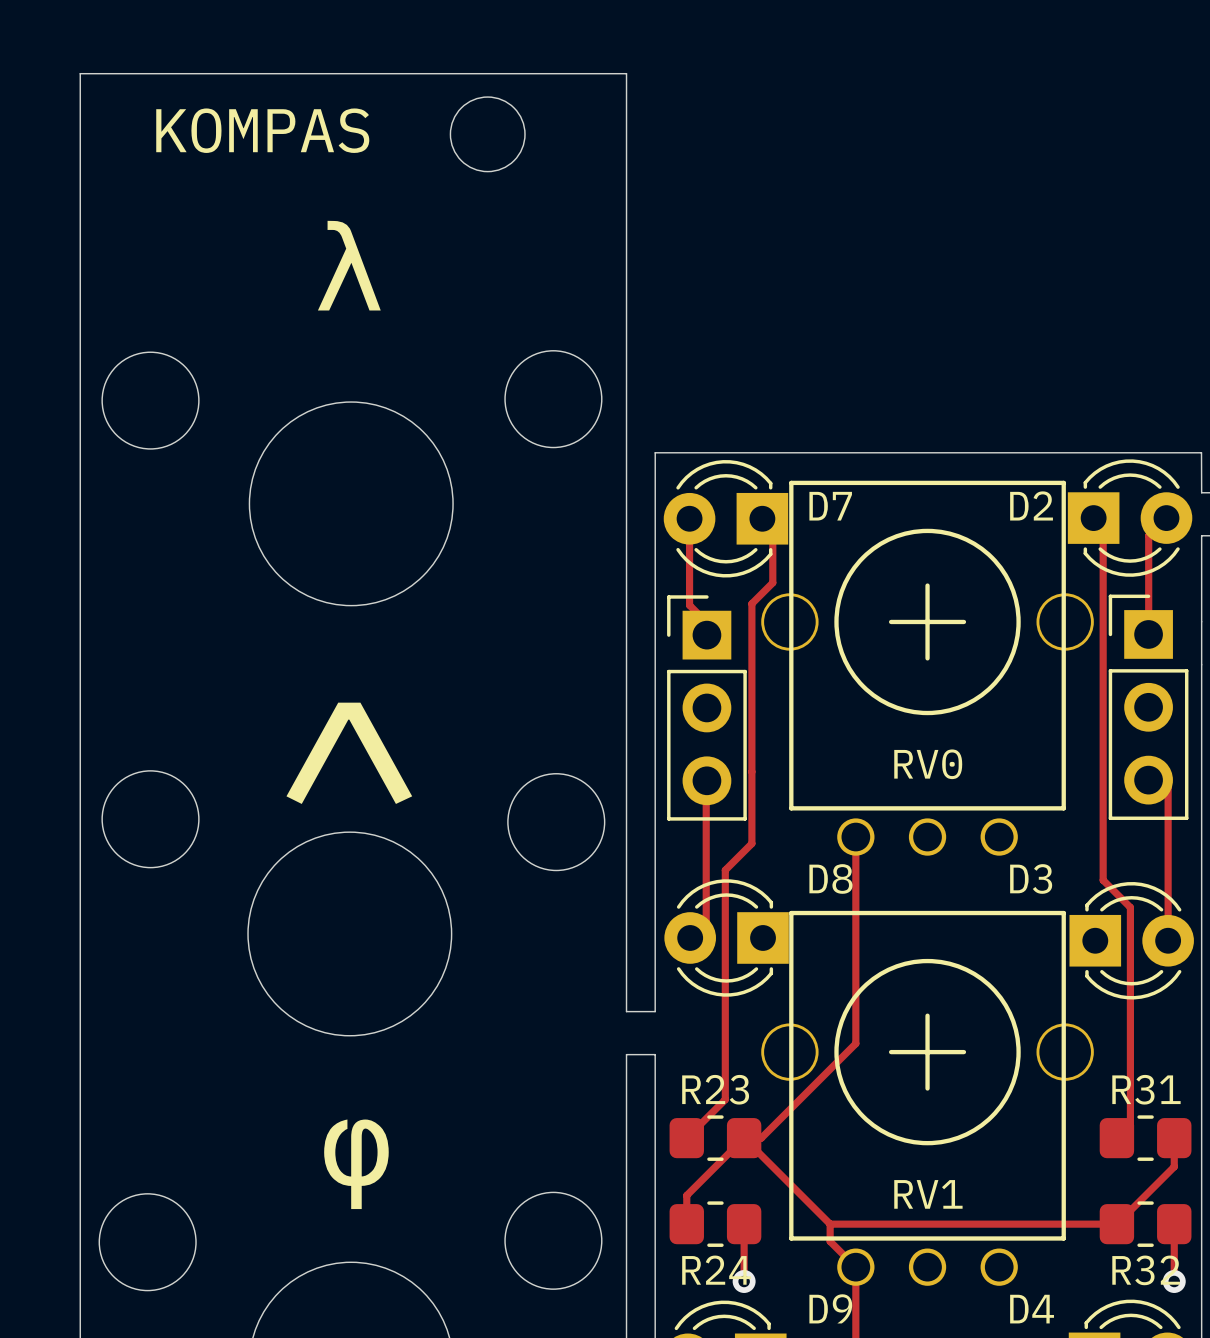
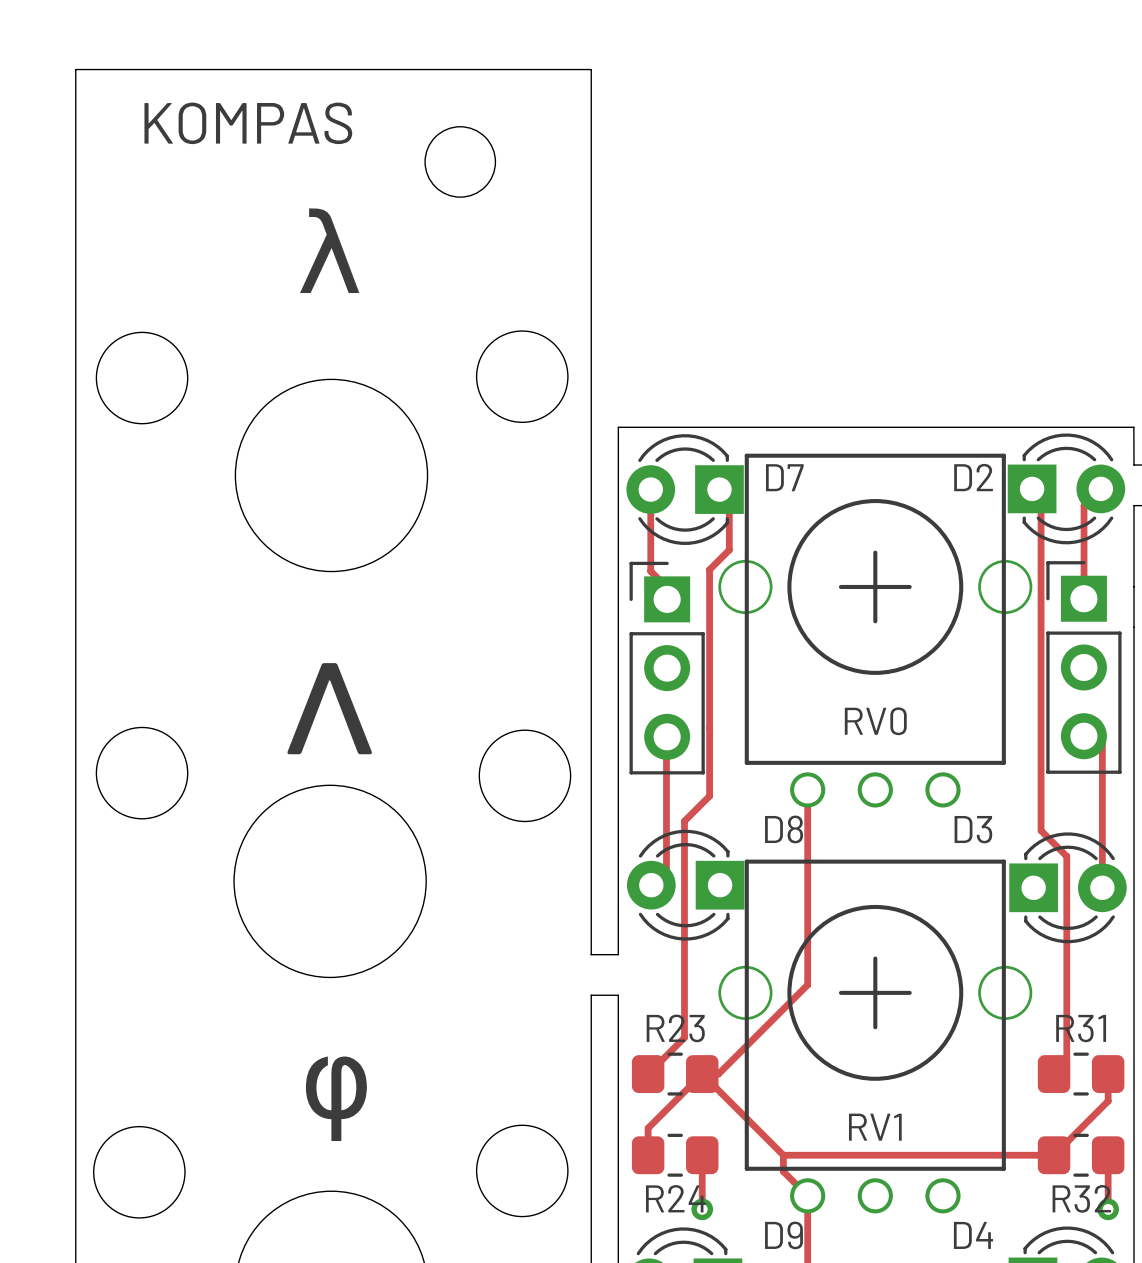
round board edge position: (487, 134) -> (460, 161)

